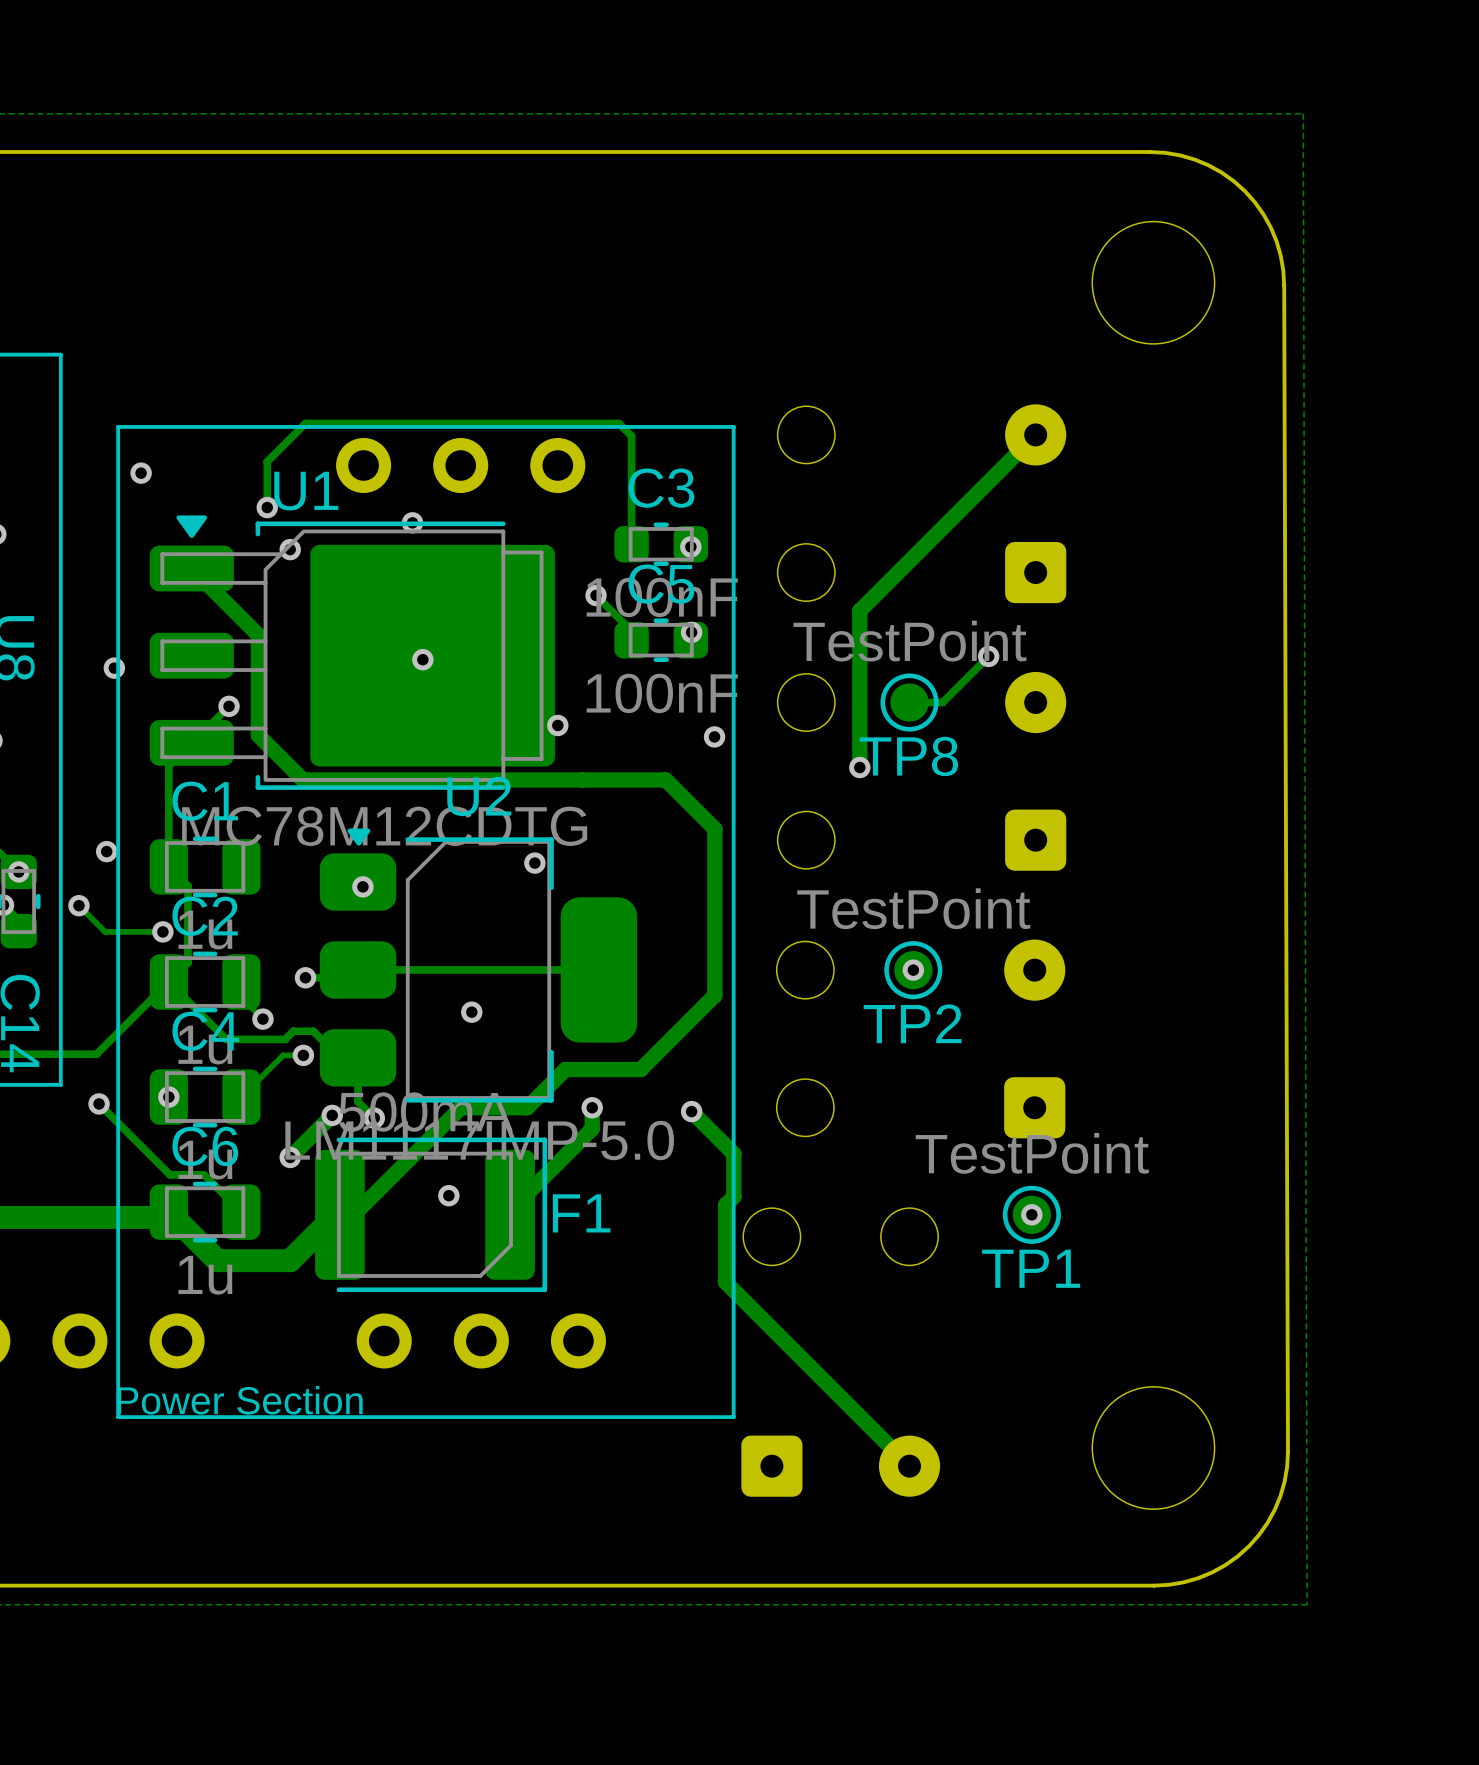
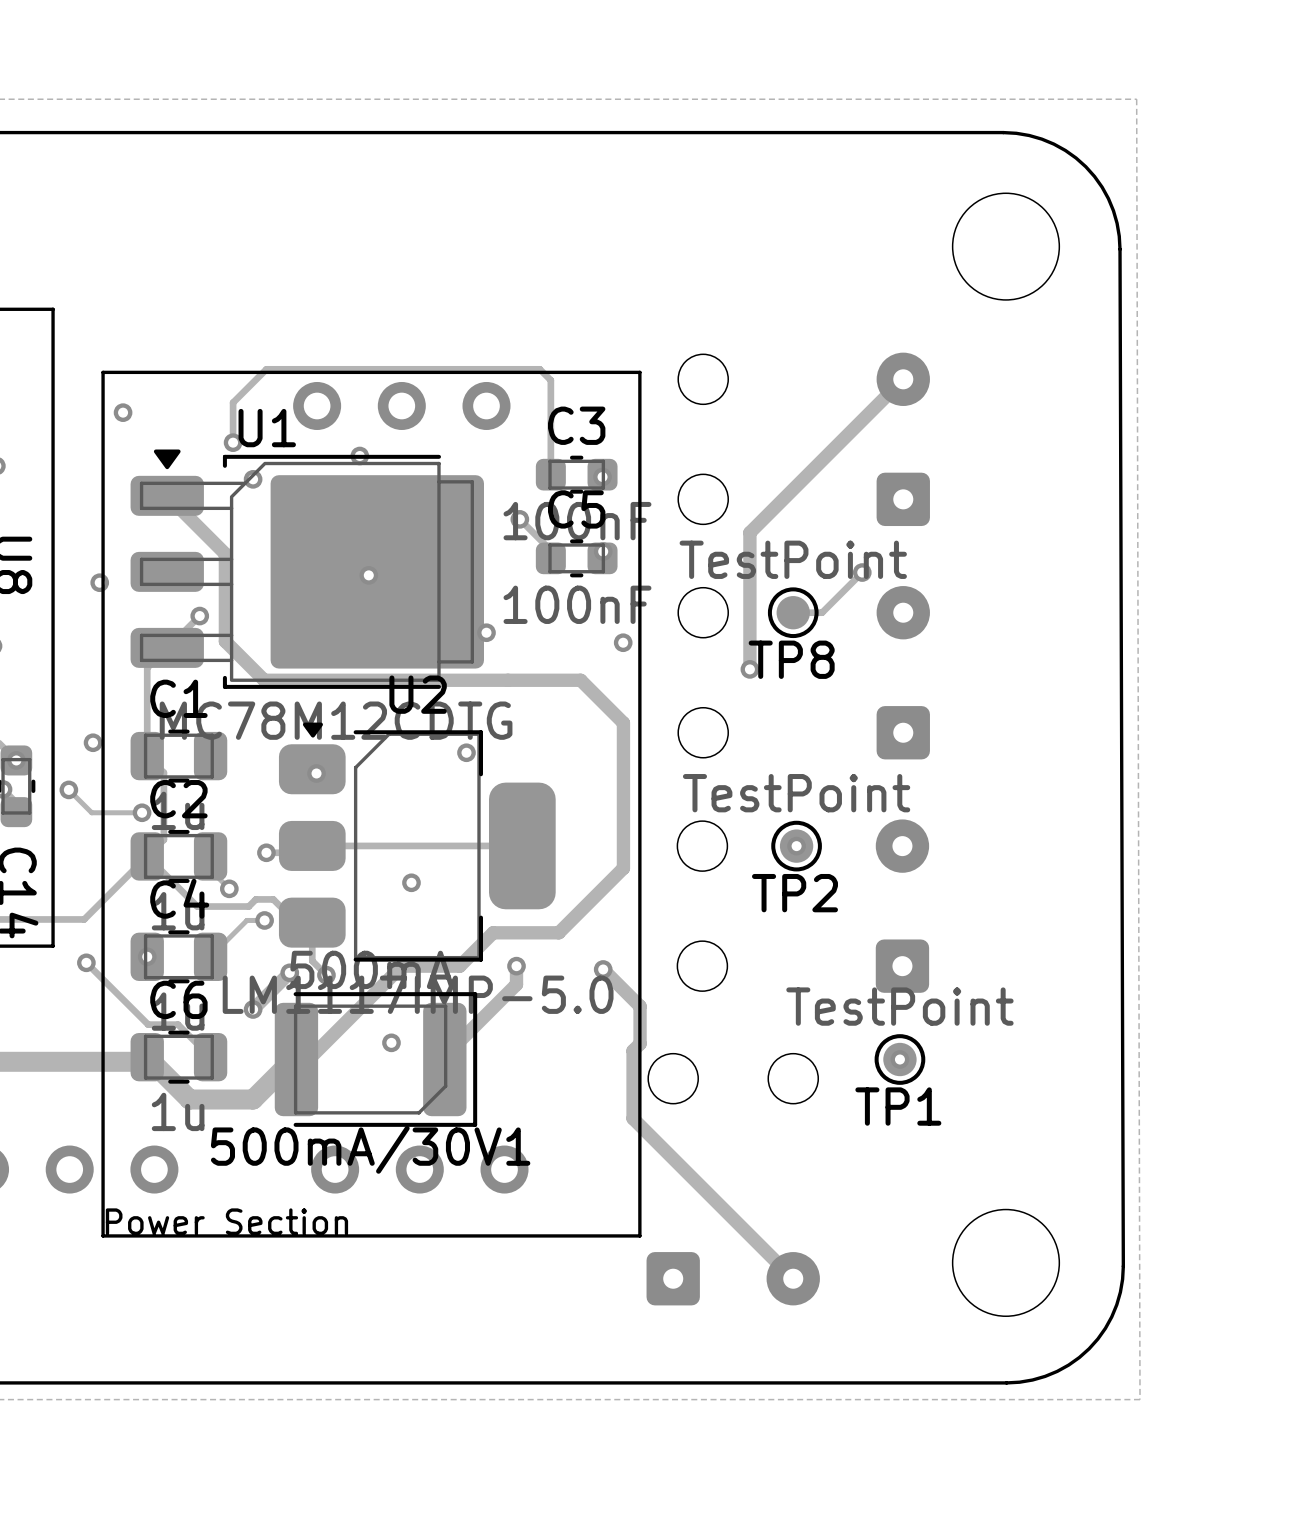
F1 name: F1 (581, 1213) -> 500mA/30V1 (370, 1149)

